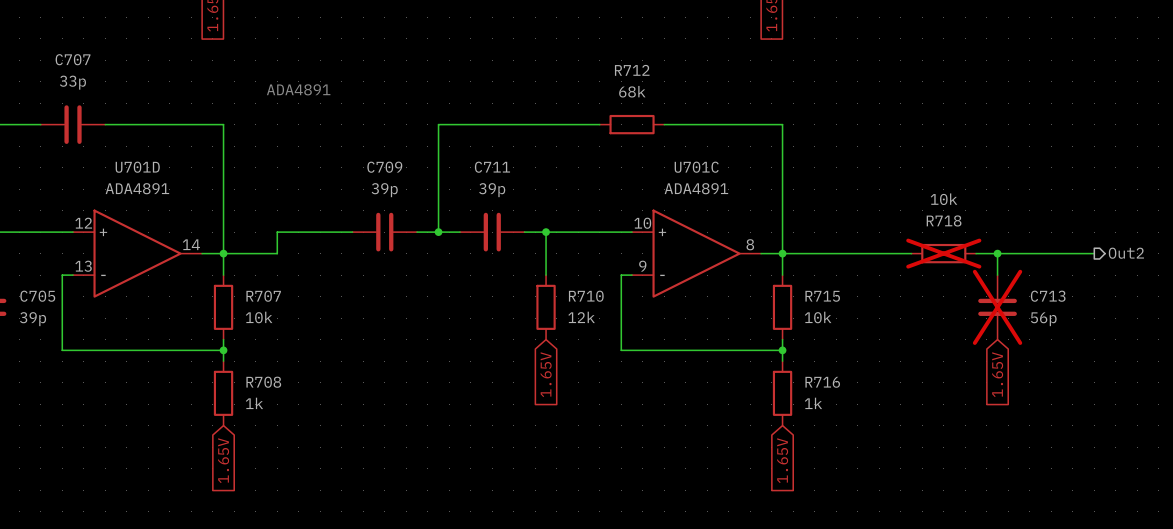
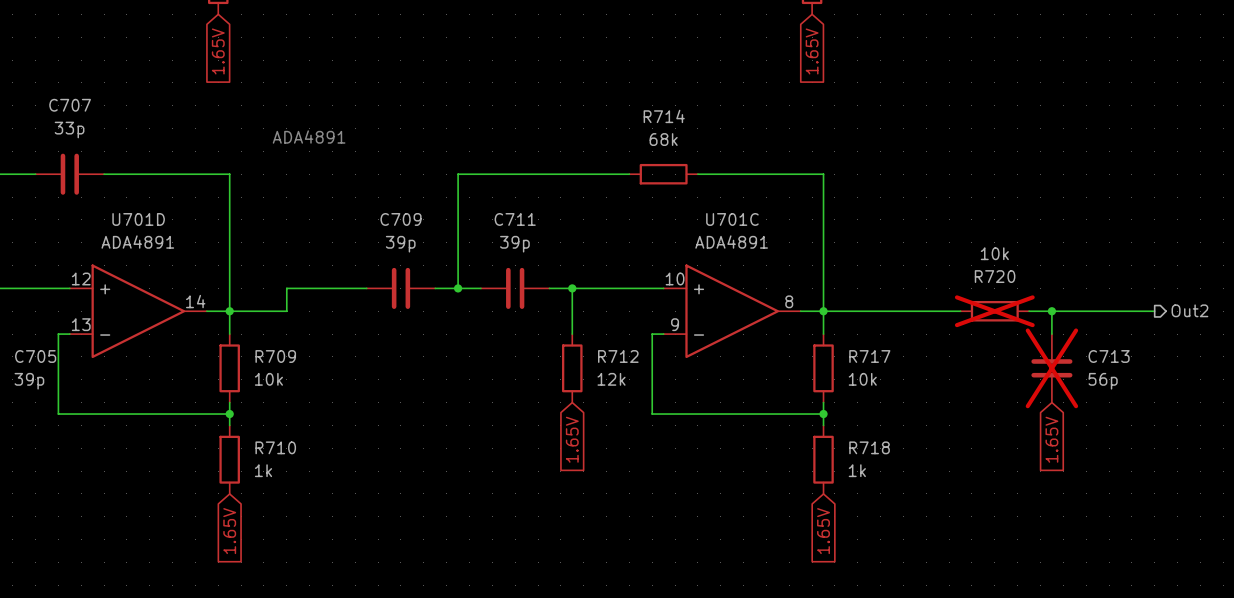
R712 name: R712 (632, 70) -> R714 (664, 116)
R718 name: R718 (944, 220) -> R720 (995, 276)
R707 name: R707 (263, 296) -> R709 (275, 356)
R710 name: R710 (586, 296) -> R712 (618, 356)
R715 name: R715 (822, 296) -> R717 (869, 356)
R708 name: R708 (263, 382) -> R710 (275, 447)
R716 name: R716 (822, 382) -> R718 (869, 447)

